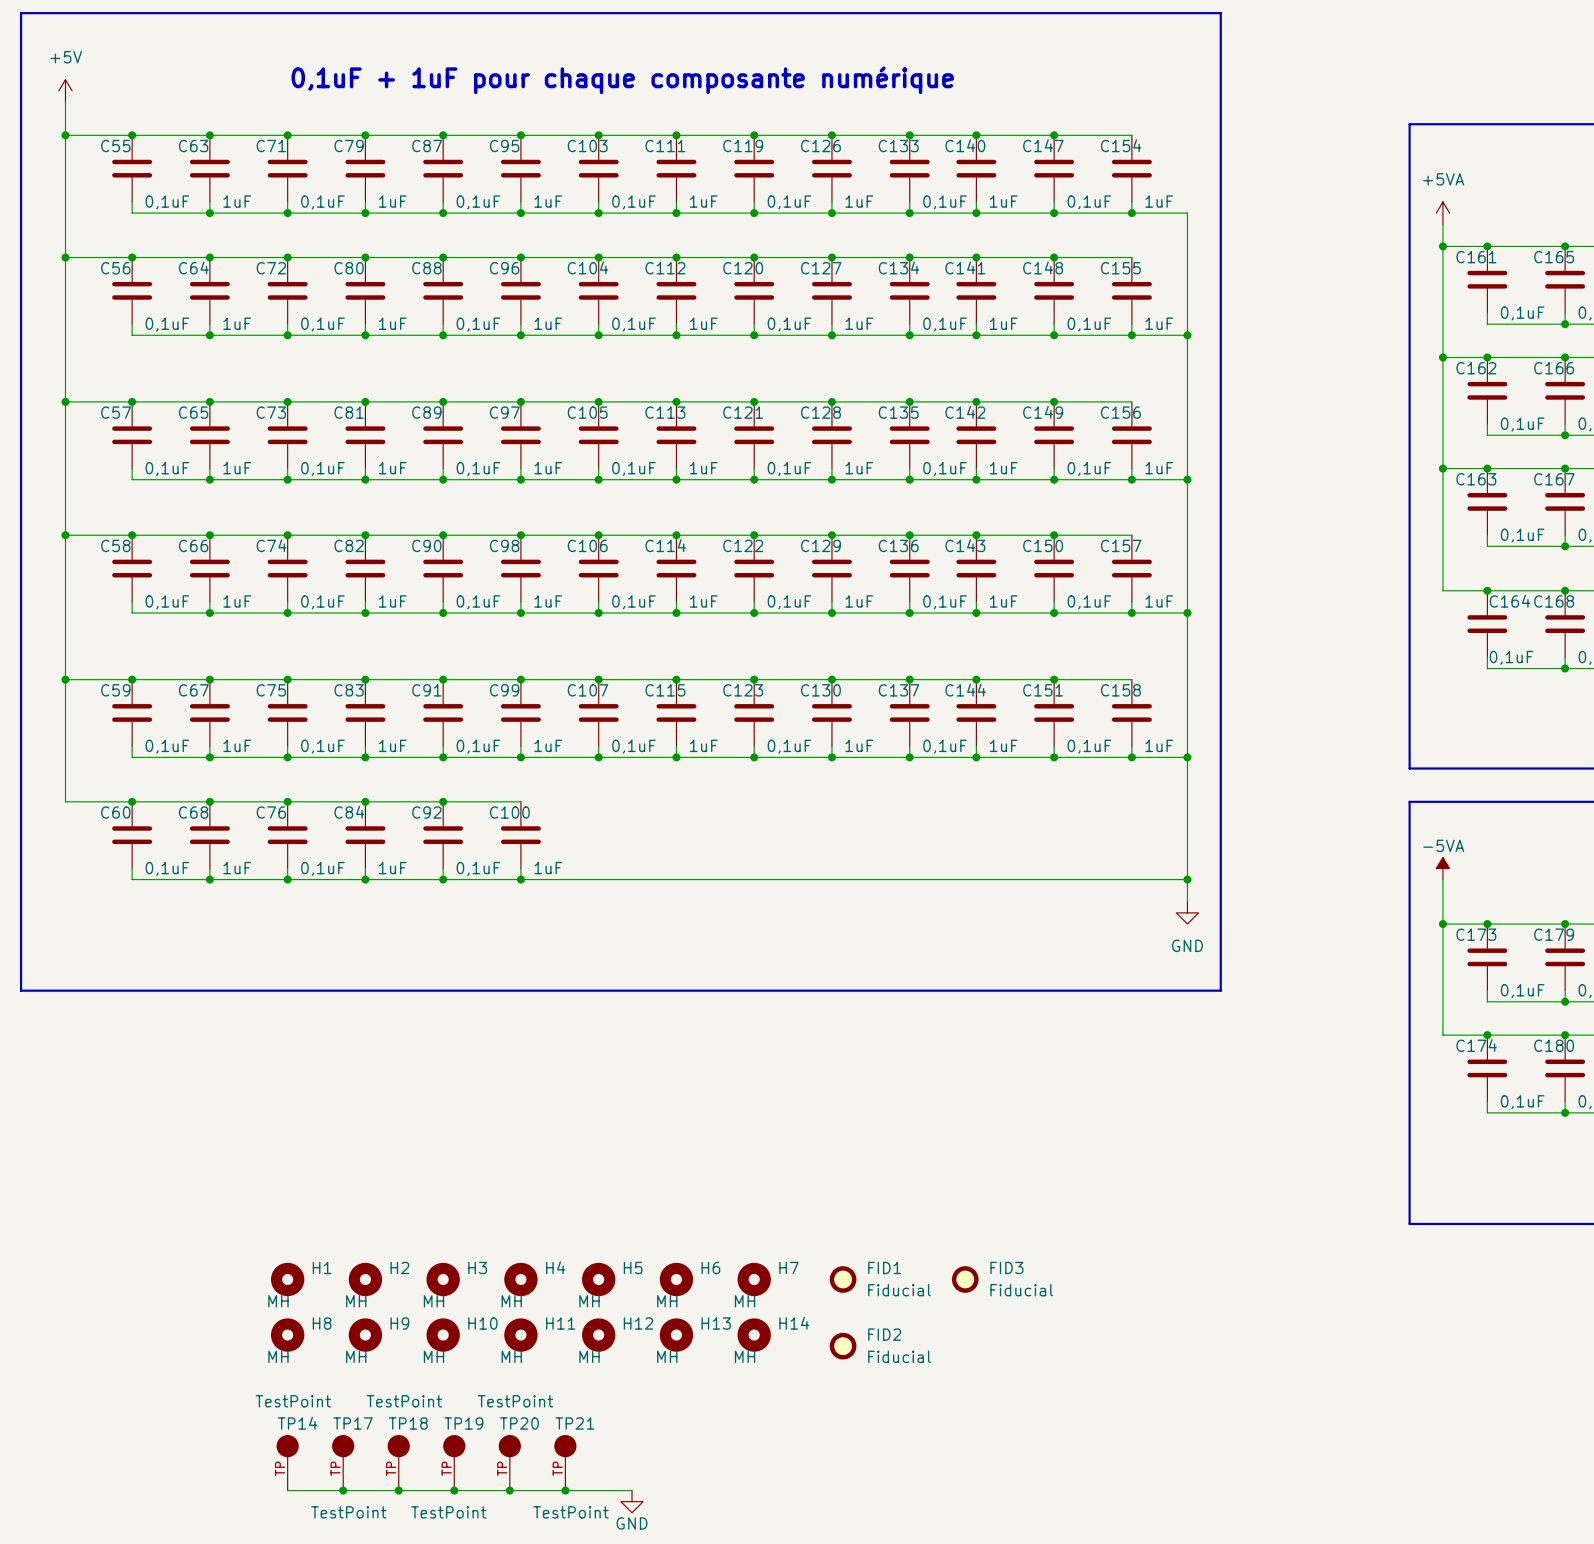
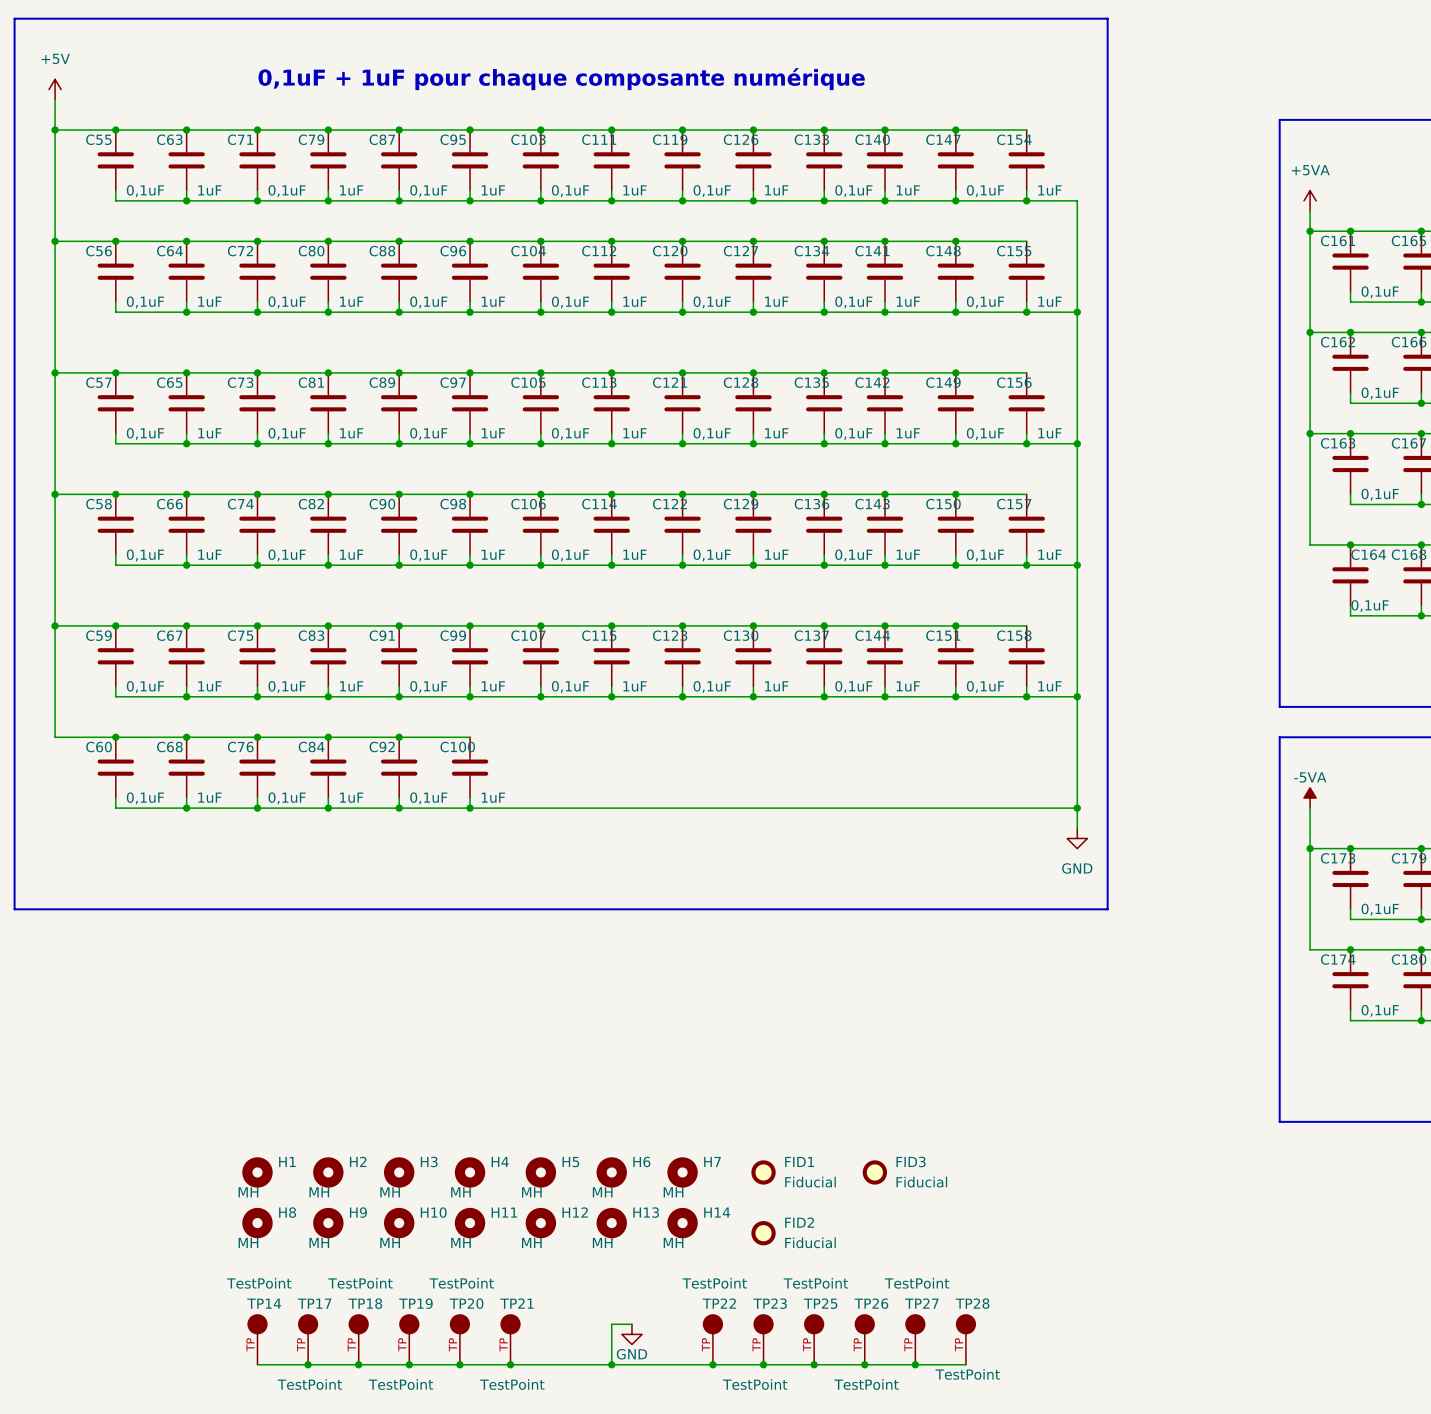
wire: none -> (631, 1324) (611, 1324) (611, 1364)
TP22: none -> TestPoint (712, 1339)
TP23: none -> TestPoint (763, 1339)
TP25: none -> TestPoint (814, 1339)
TP26: none -> TestPoint (864, 1339)
TP27: none -> TestPoint (915, 1339)
TP28: none -> TestPoint (965, 1339)
wire: none -> (571, 1364) (965, 1364)
junction: none -> (611, 1364)
junction: none -> (712, 1364)
junction: none -> (763, 1364)
junction: none -> (814, 1364)
junction: none -> (864, 1364)
junction: none -> (915, 1364)
power symbol position: GND (632, 1501) -> GND (631, 1334)

